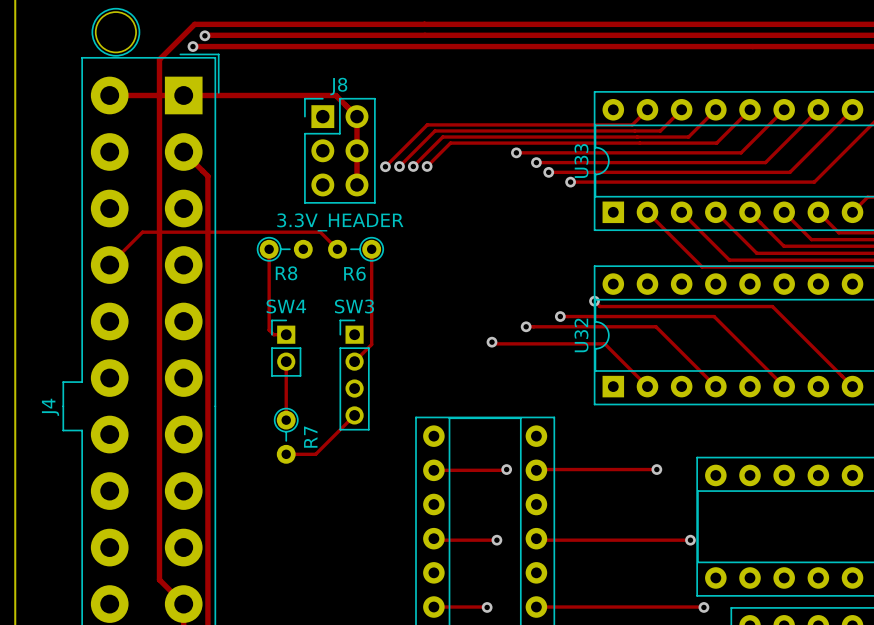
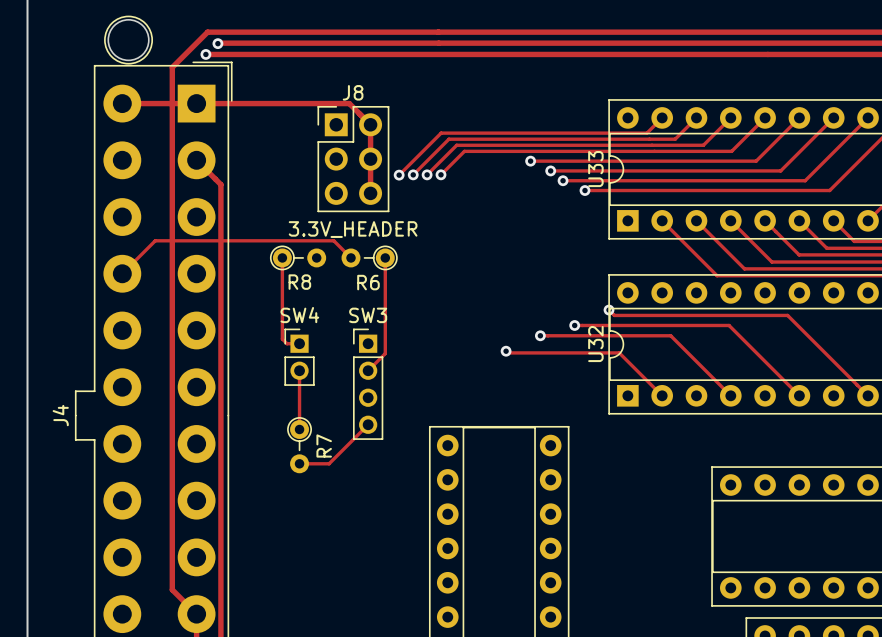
track: (506, 469) (433, 470) -> none
via: (506, 469) -> none
track: (656, 469) (536, 470) -> none
via: (656, 469) -> none
track: (433, 538) (496, 540) -> none
track: (536, 538) (690, 540) -> none
via: (496, 540) -> none
via: (690, 540) -> none
track: (433, 607) (487, 607) -> none
via: (487, 607) -> none
track: (536, 607) (703, 607) -> none
via: (703, 607) -> none

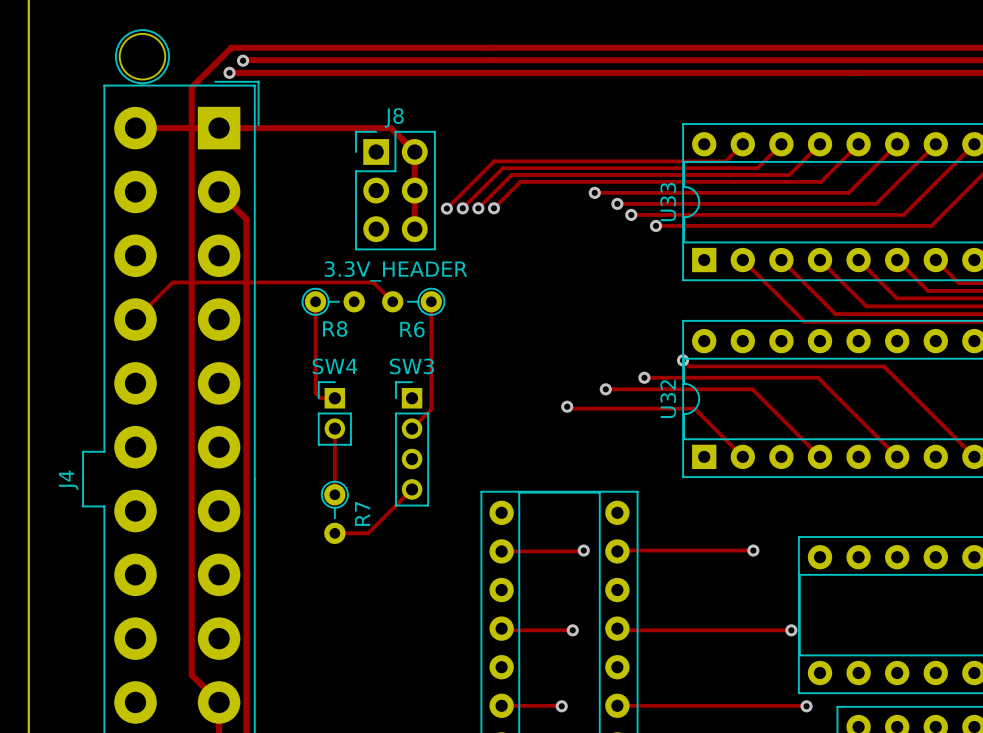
track: none -> (583, 550) (501, 551)
via: none -> (583, 550)
track: none -> (753, 550) (617, 551)
via: none -> (753, 550)
track: none -> (501, 628) (503, 630) (572, 630)
track: none -> (617, 628) (619, 630) (791, 630)
via: none -> (572, 630)
via: none -> (791, 630)
track: none -> (501, 705) (561, 706)
via: none -> (561, 706)
track: none -> (617, 705) (806, 706)
via: none -> (806, 706)

